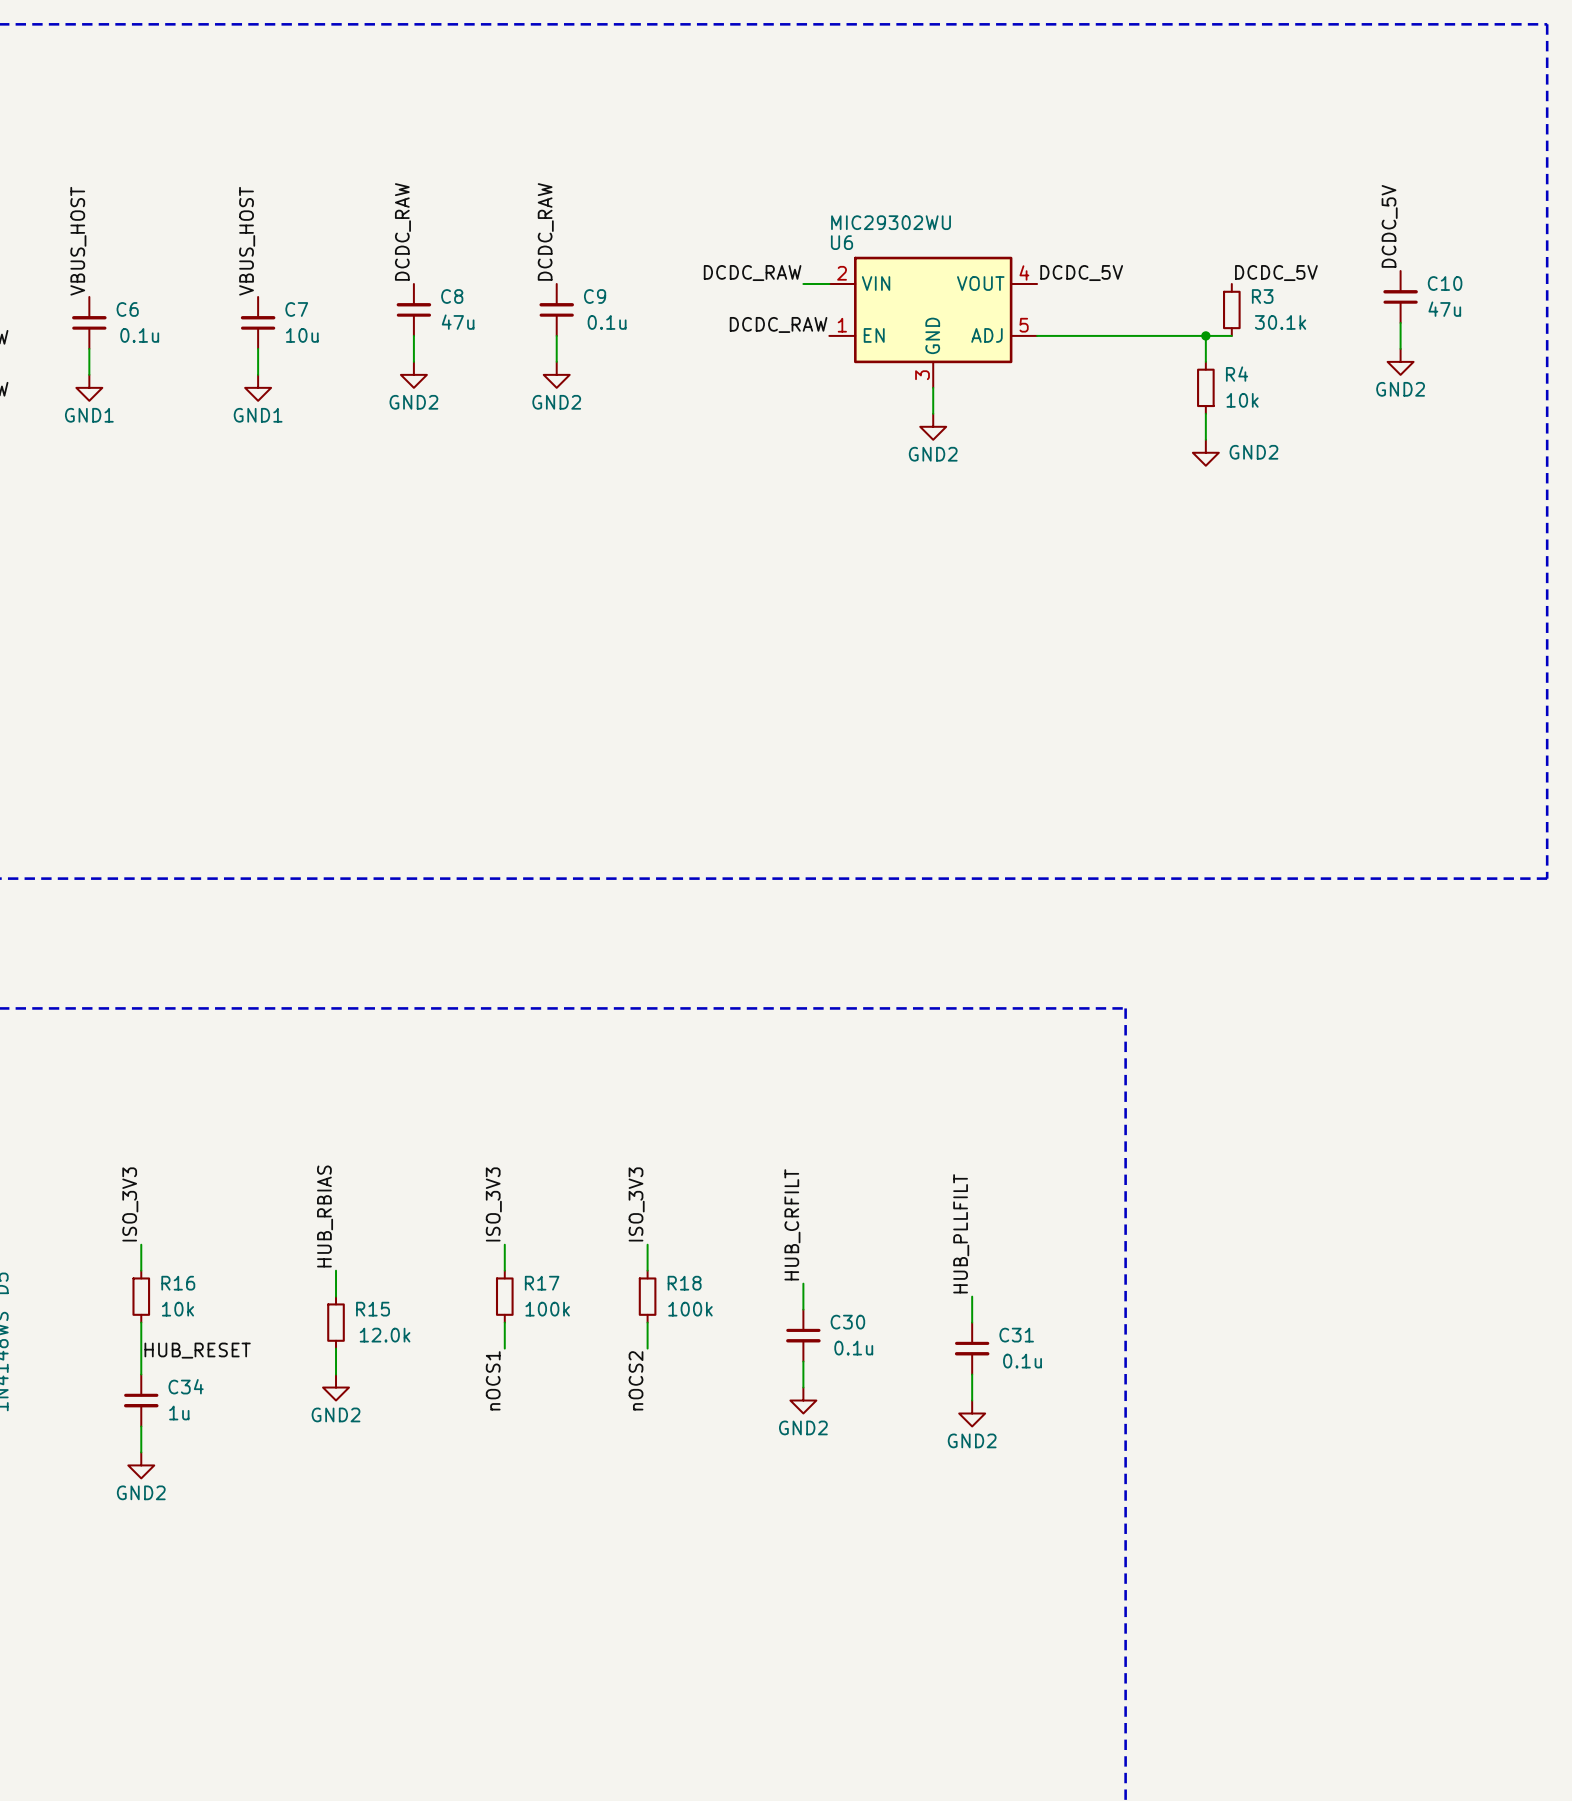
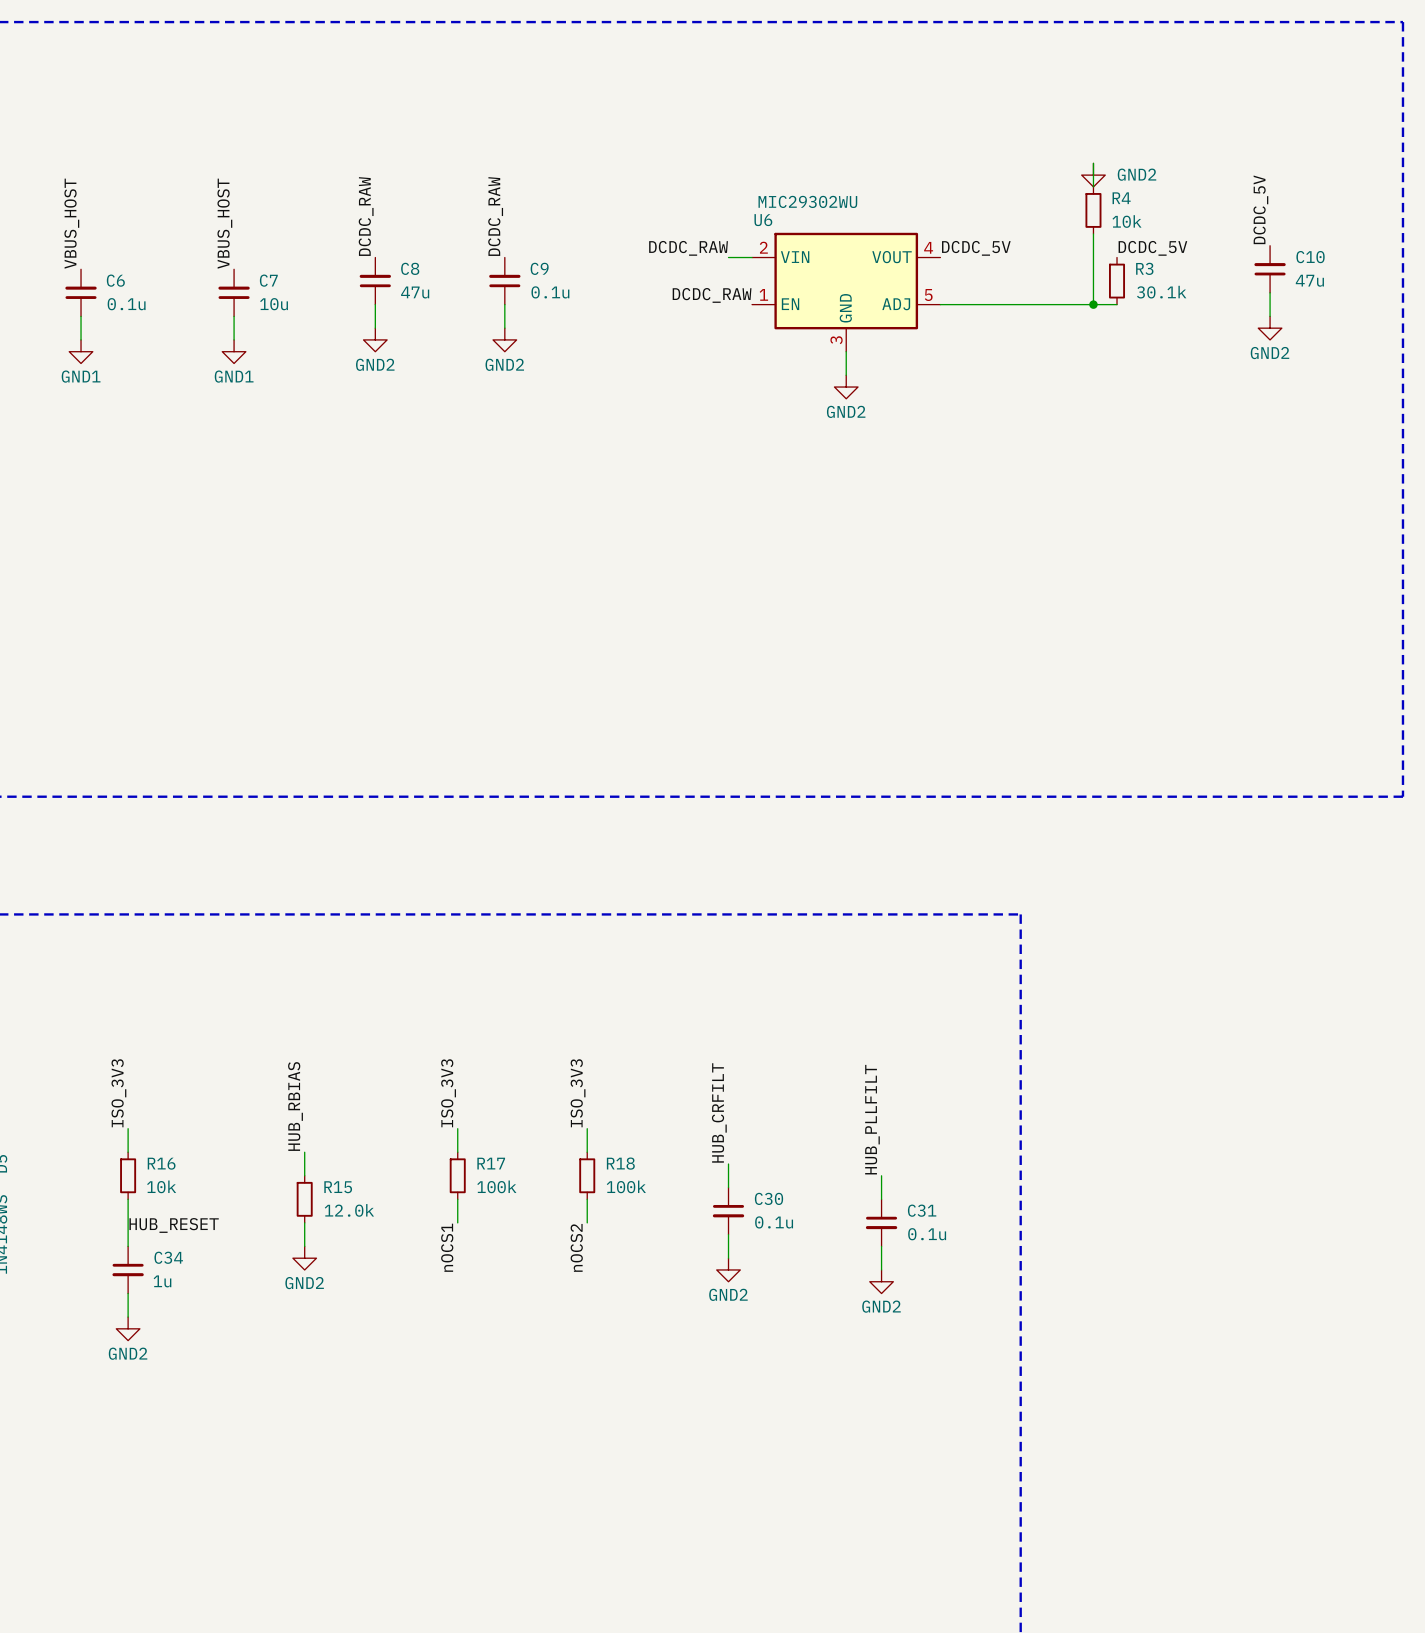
power symbol: none -> GND2 (1093, 175)
wire: (1205, 335) (1205, 361) -> (1093, 304) (1093, 233)
R4 position: (1205, 387) -> (1093, 210)
wire: (1205, 413) (1205, 439) -> (1093, 163) (1093, 186)
power symbol: GND2 (1205, 452) -> none

